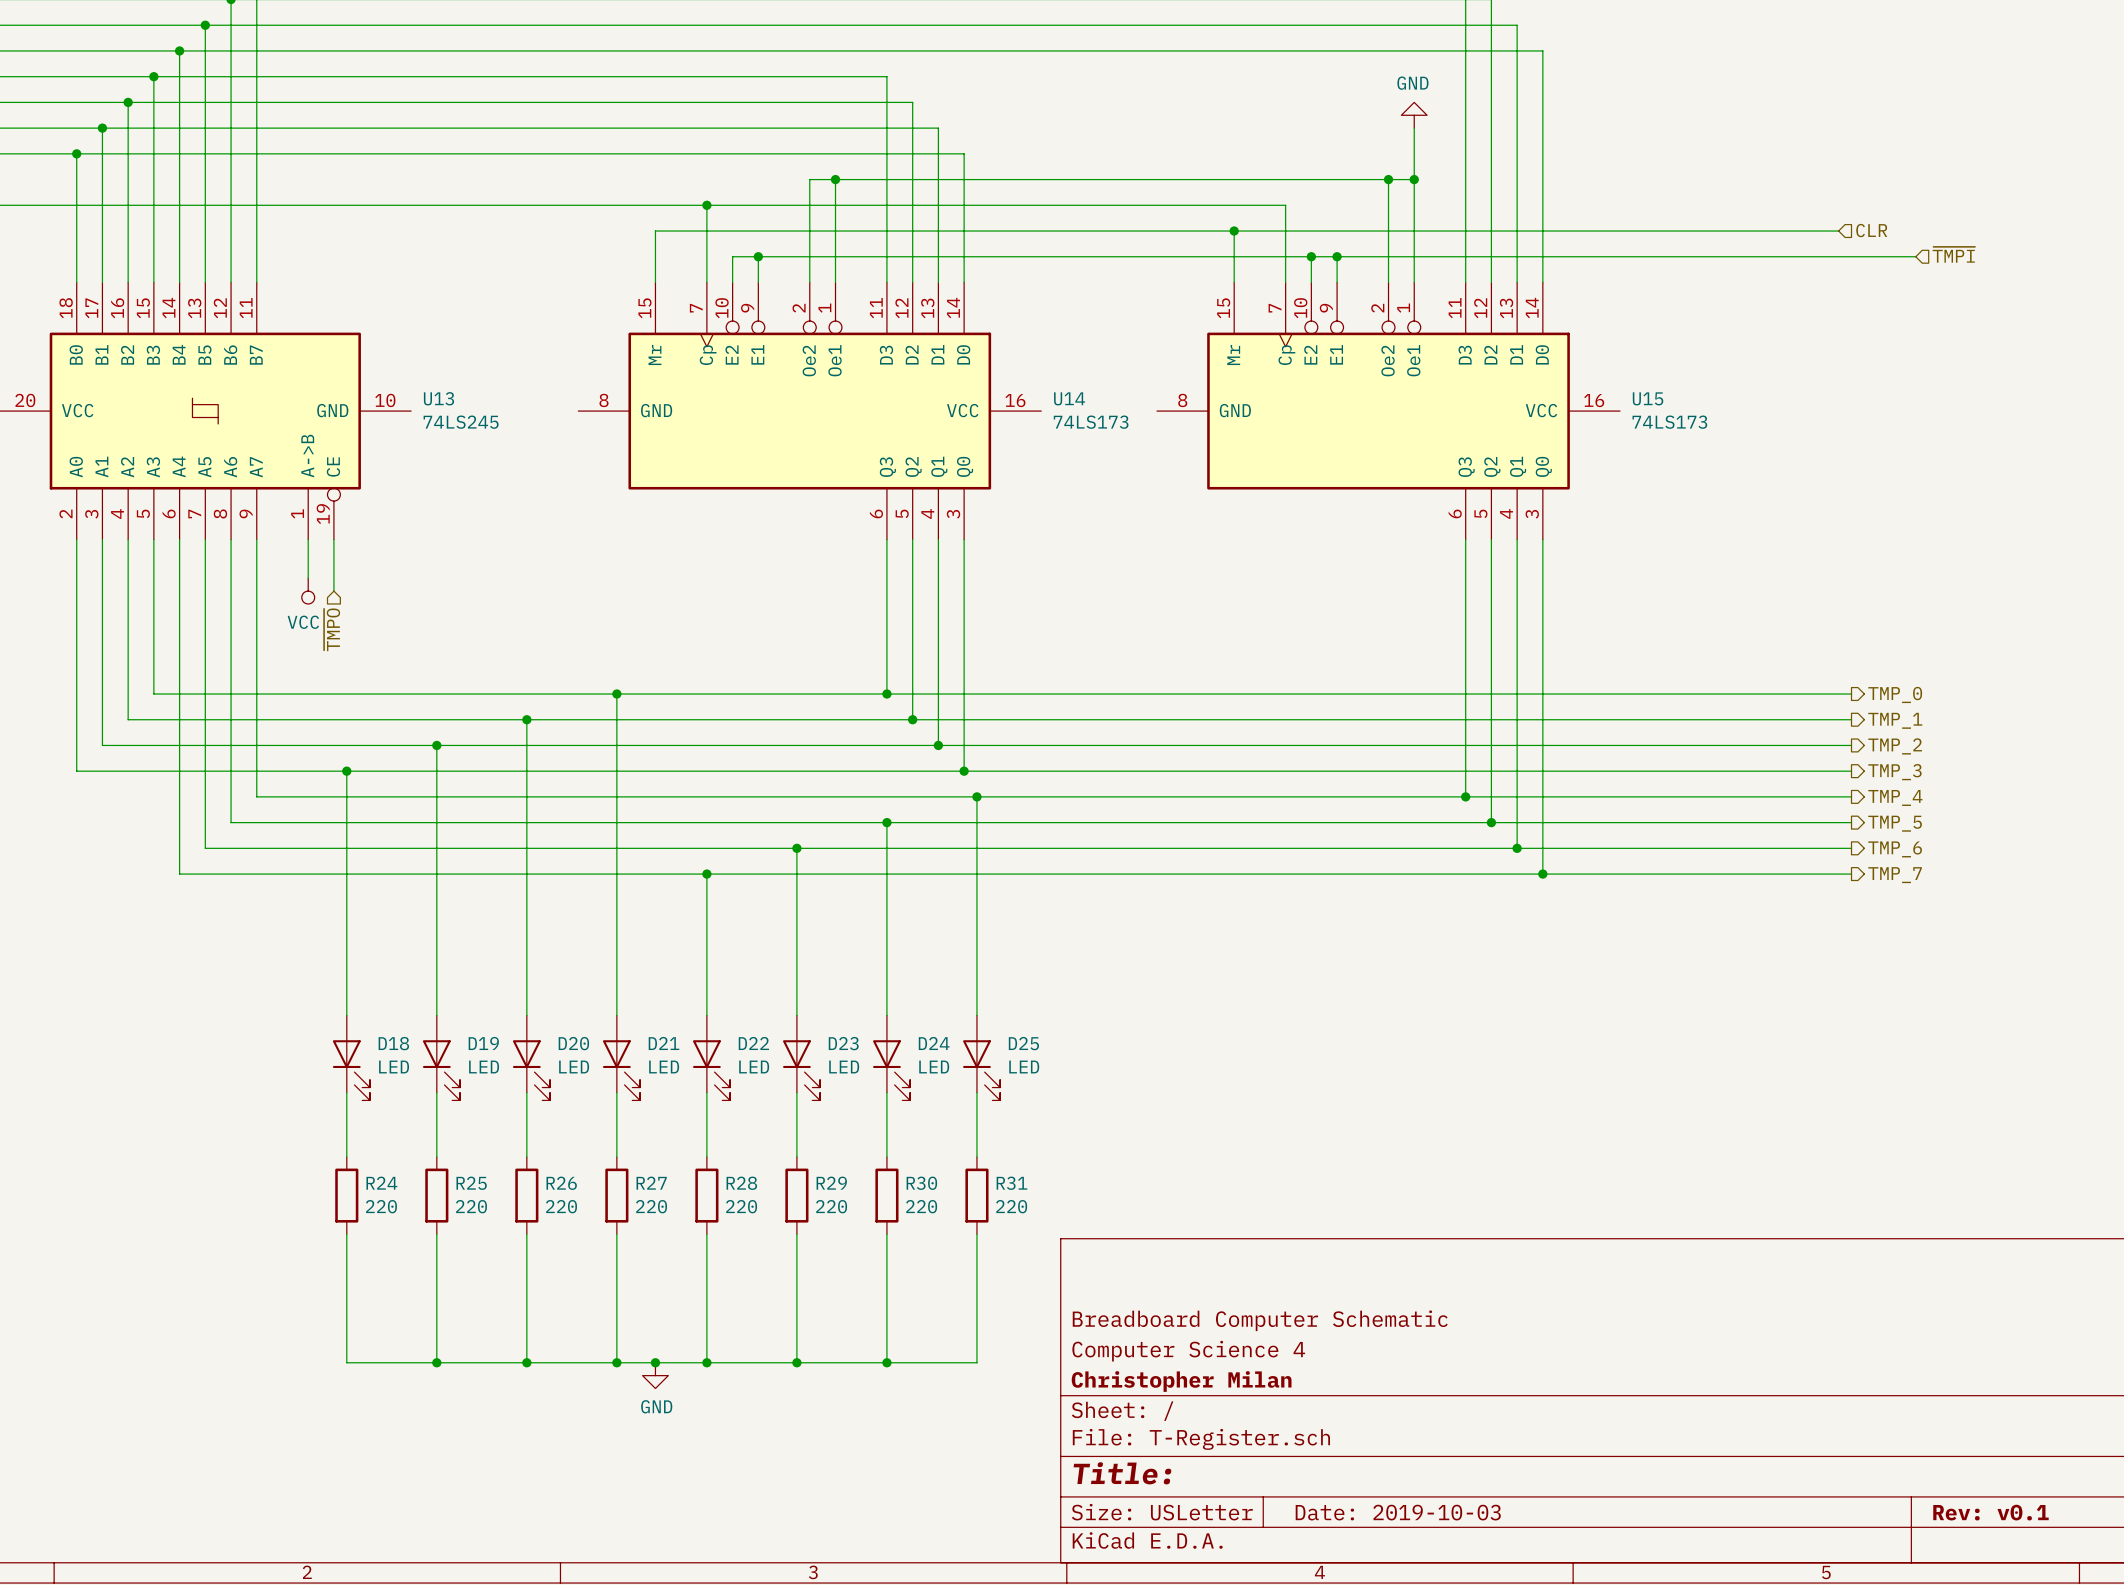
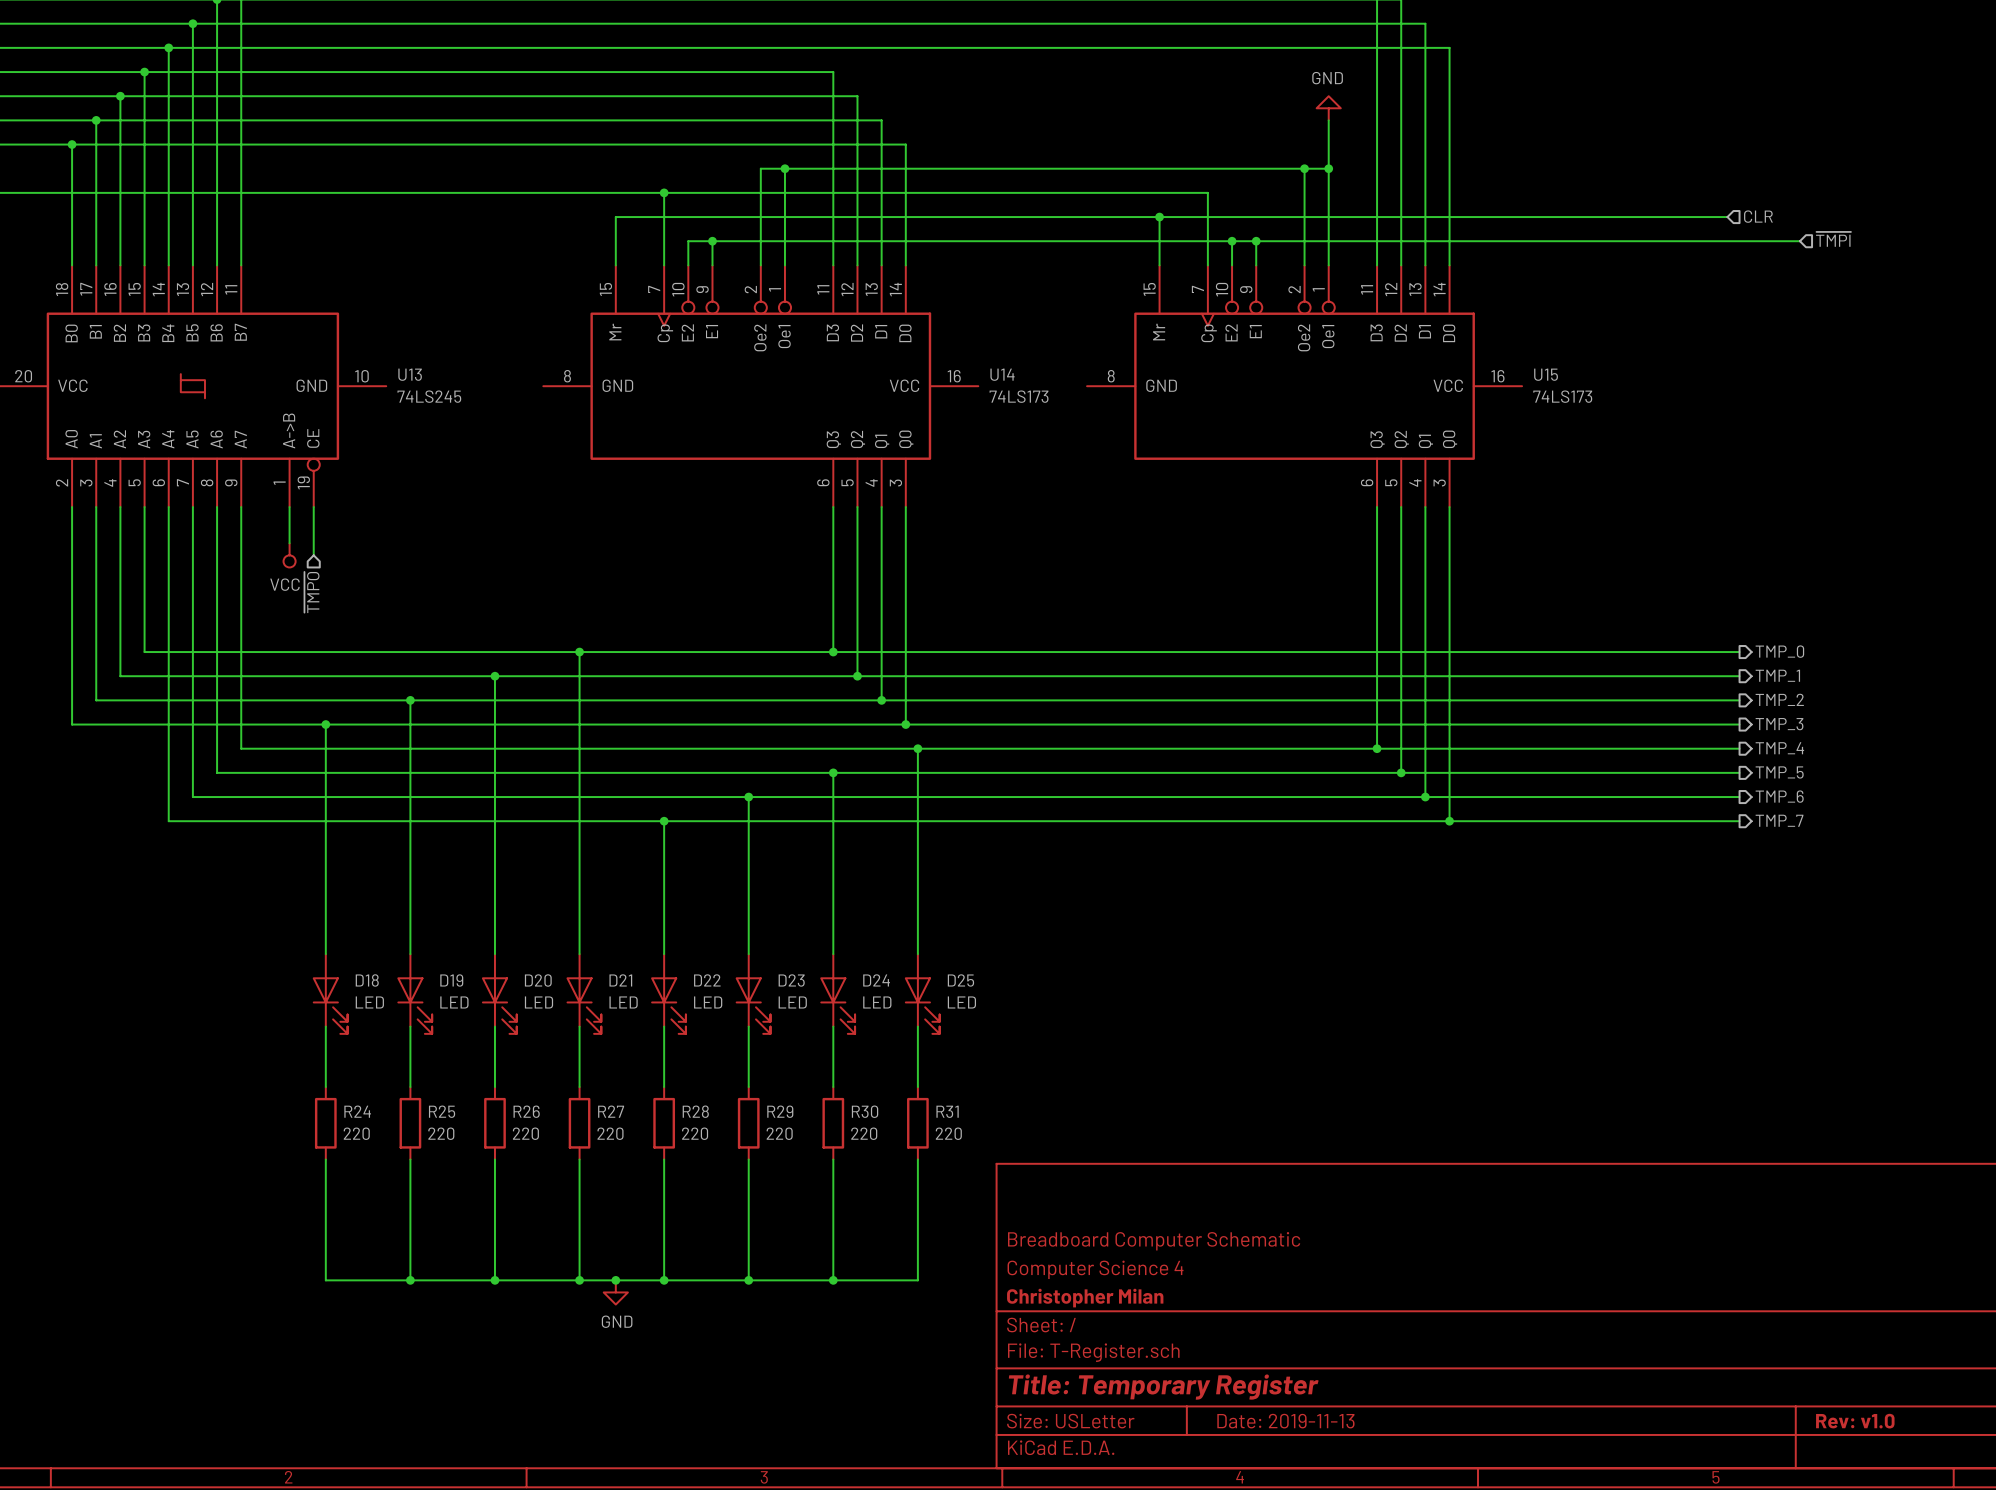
title block: Title: (1122, 1473) -> Title: Temporary Register (1163, 1387)
title block: Date: 2019-10-03 (1398, 1512) -> Date: 2019-11-13 (1285, 1421)
title block: Rev: v0.1 (1990, 1512) -> Rev: v1.0 (1855, 1421)

